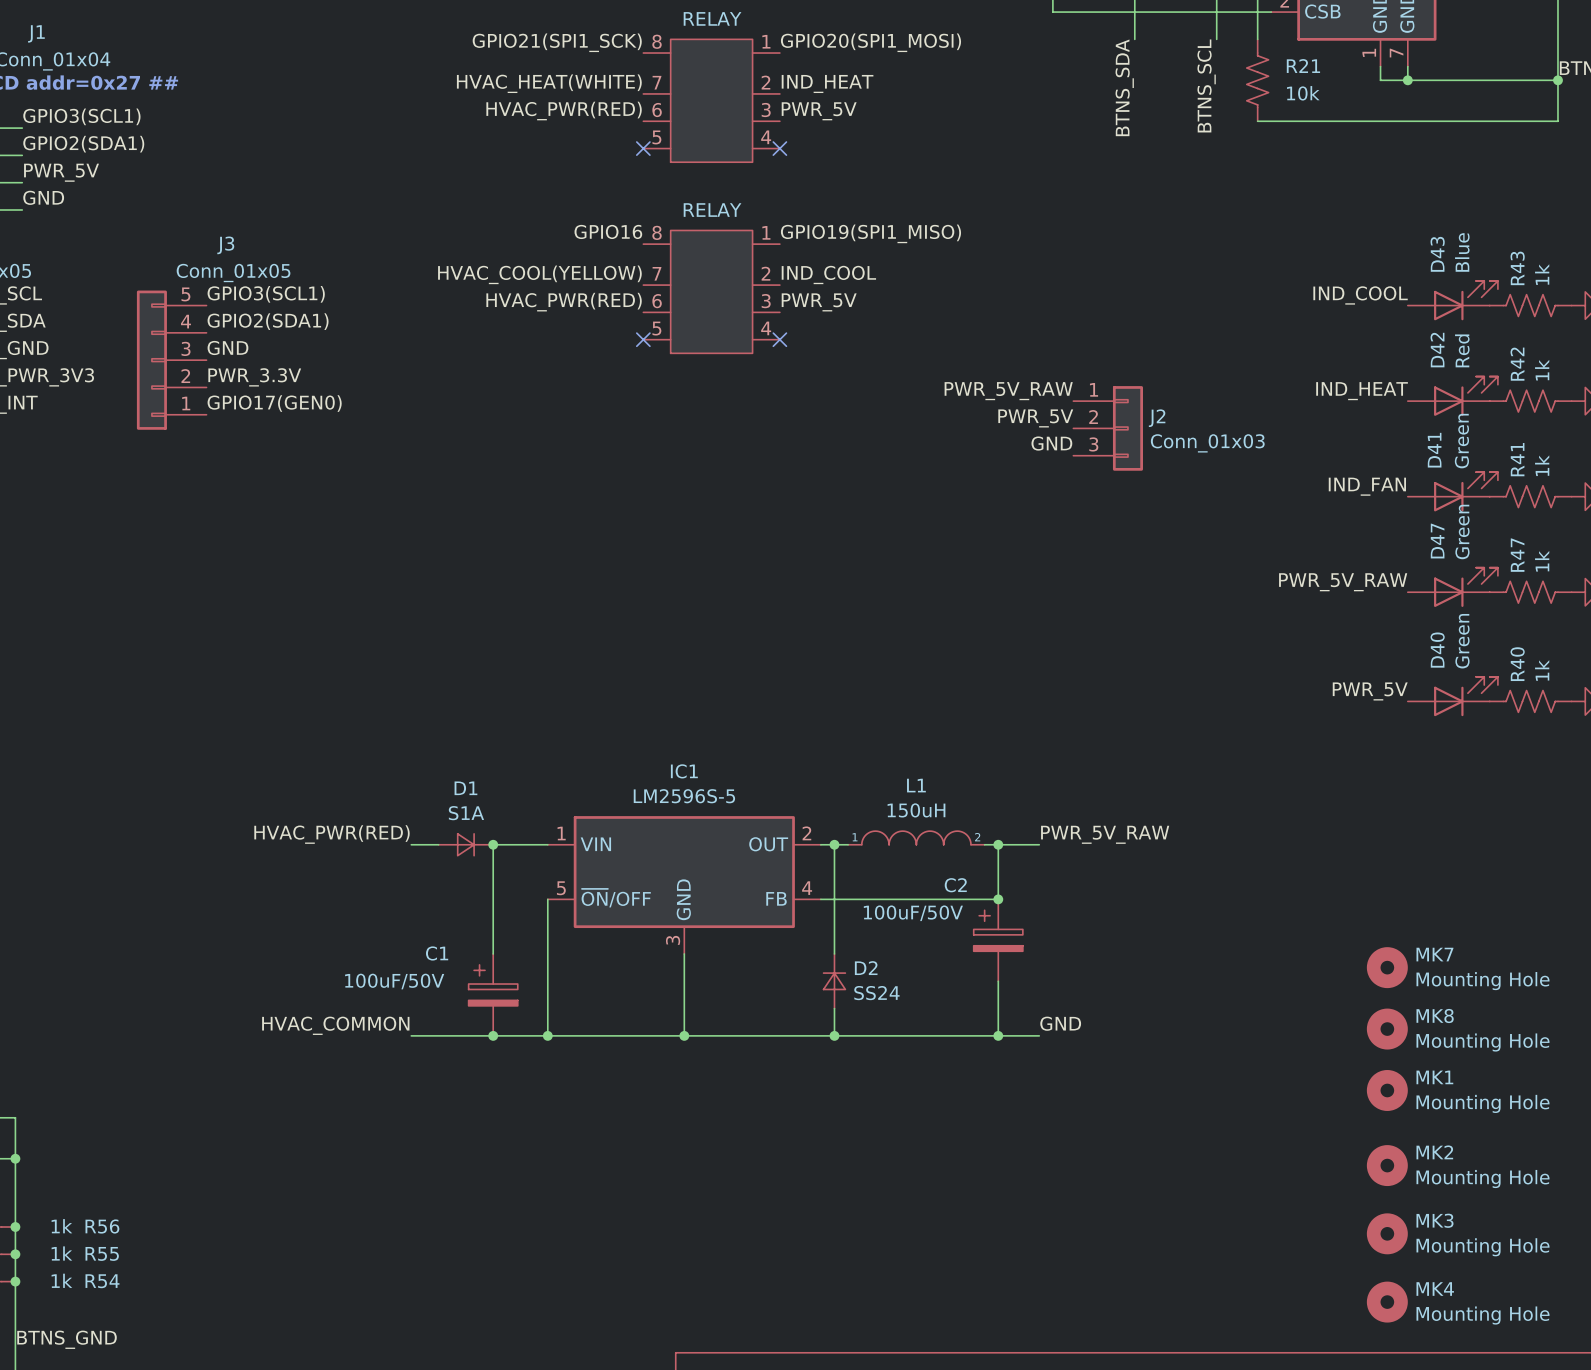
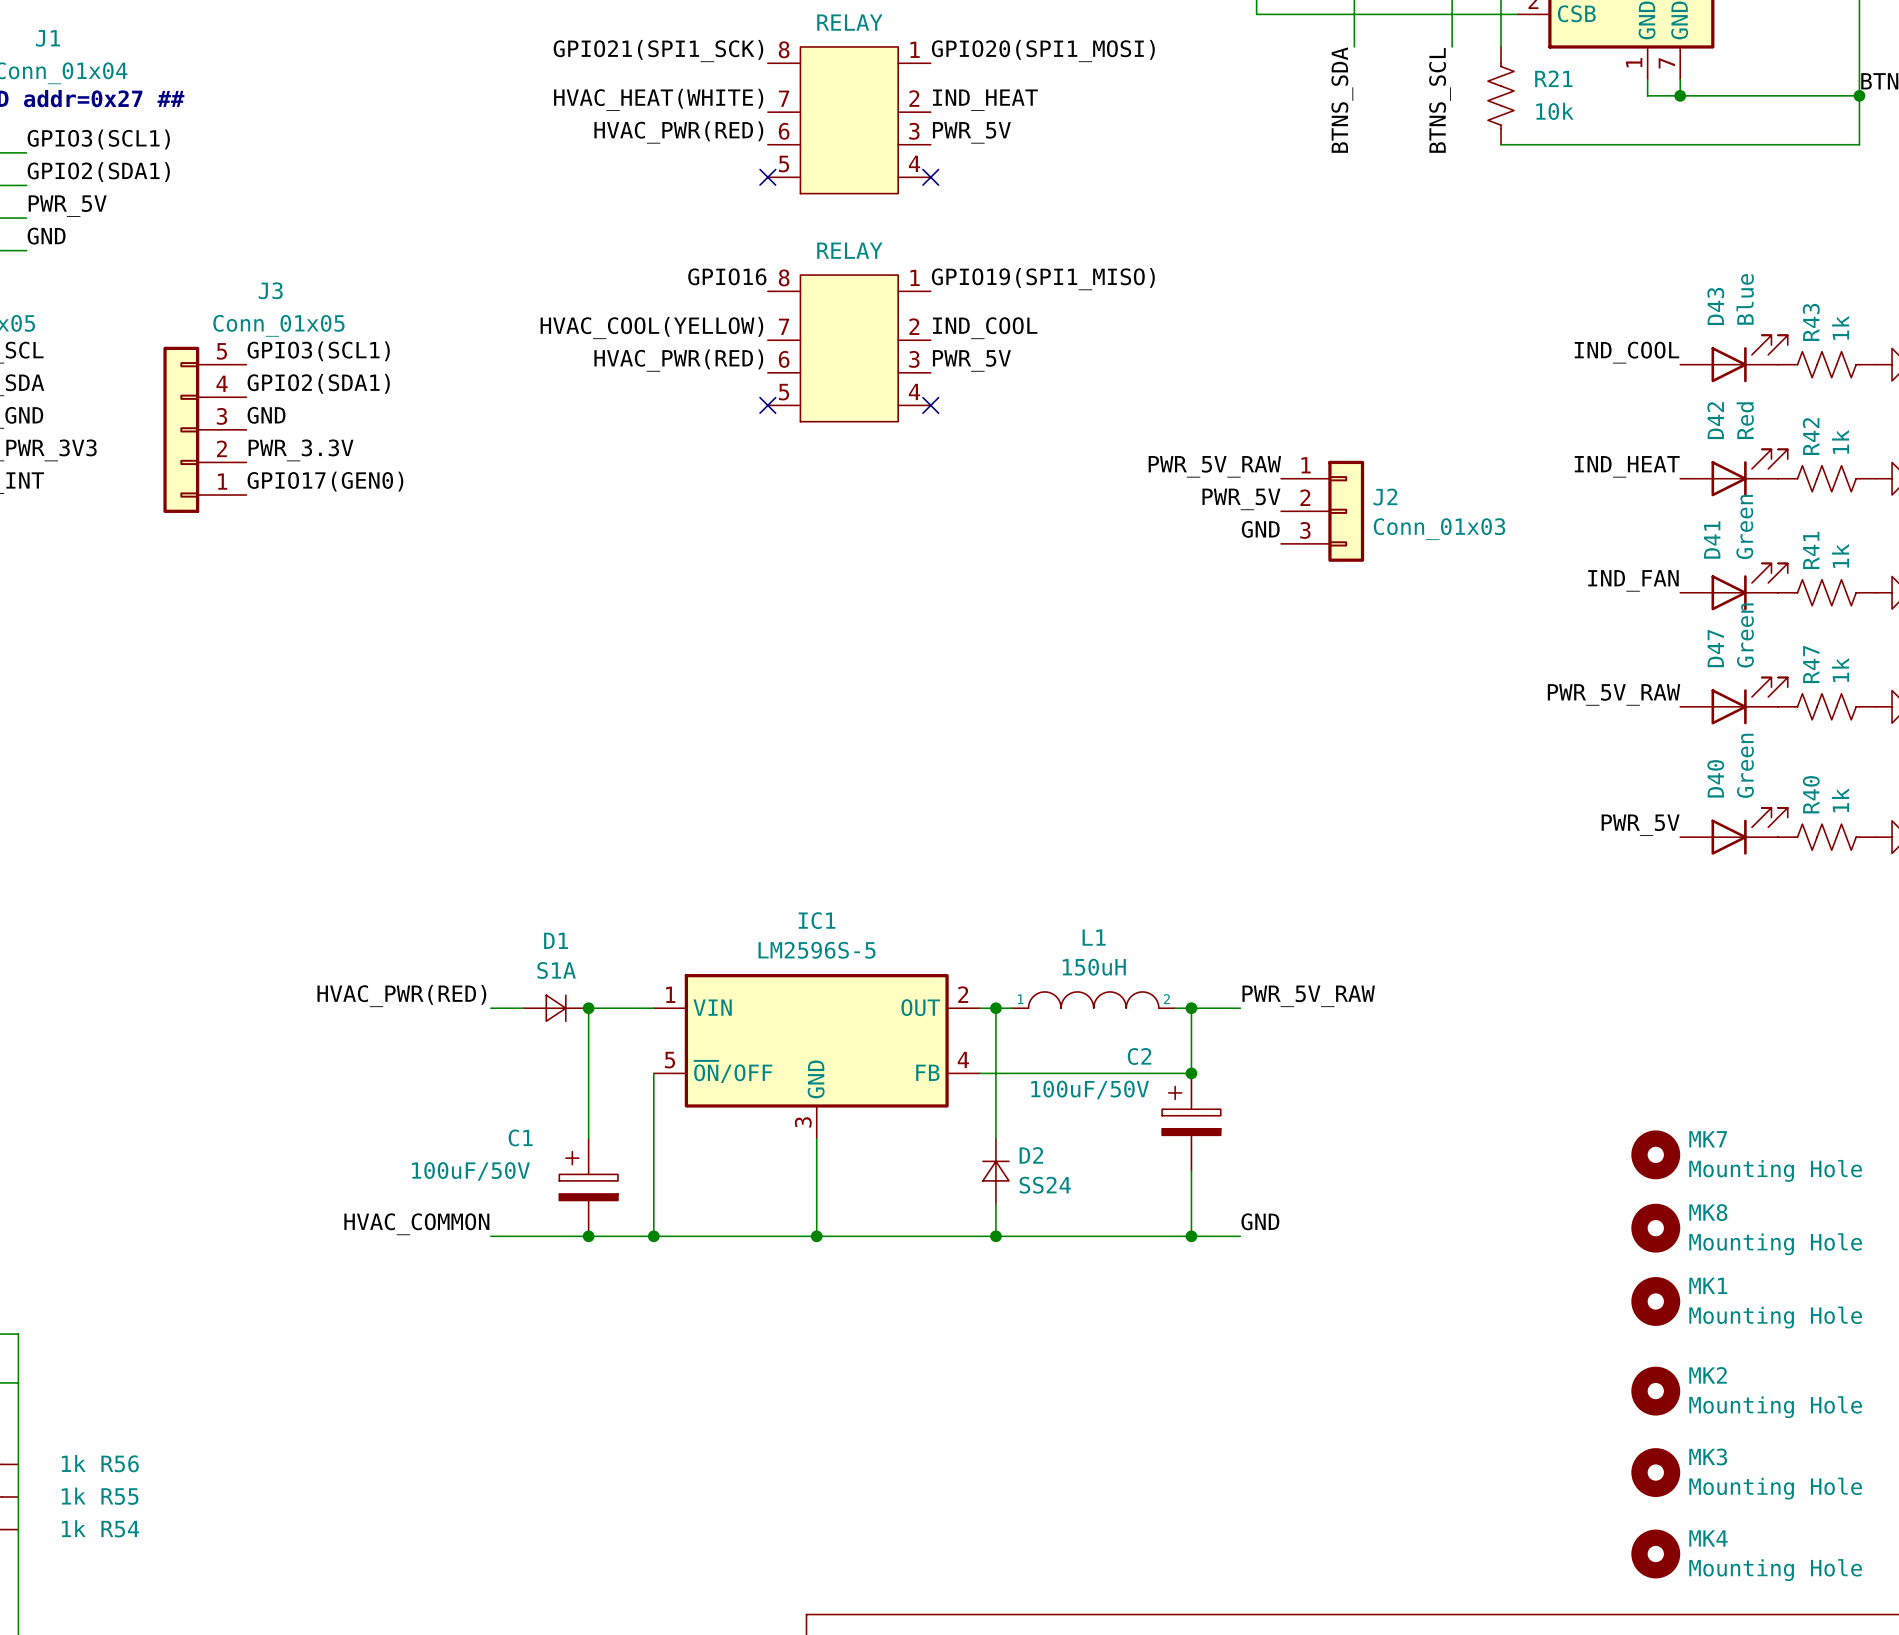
junction: (15, 1158) -> none
junction: (15, 1227) -> none
junction: (15, 1254) -> none
junction: (15, 1281) -> none
label: BTNS_GND (67, 1339) -> none

